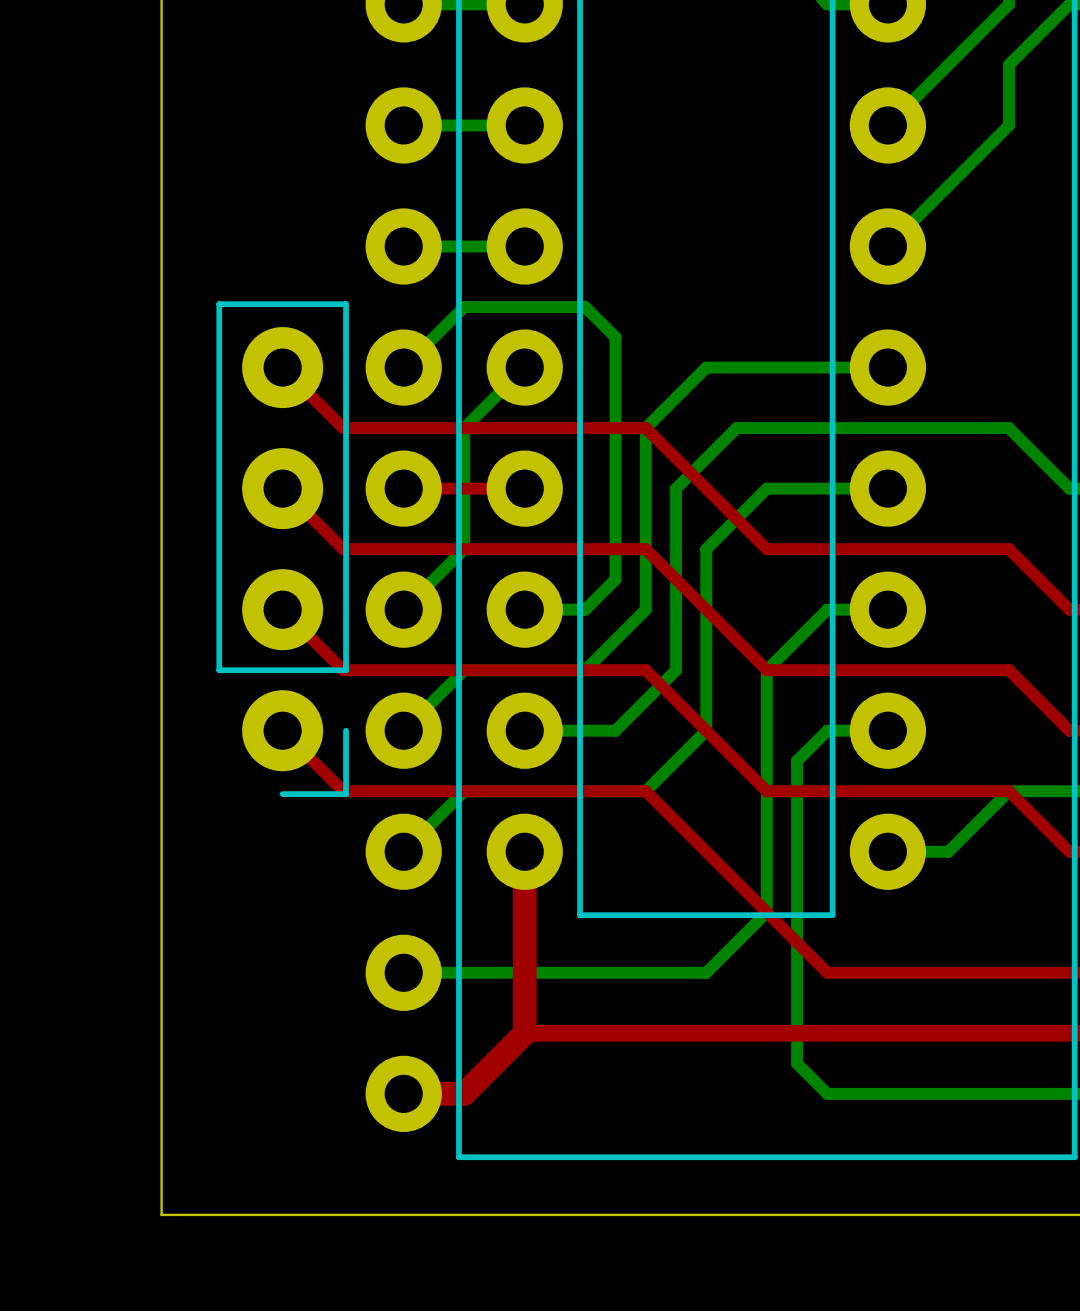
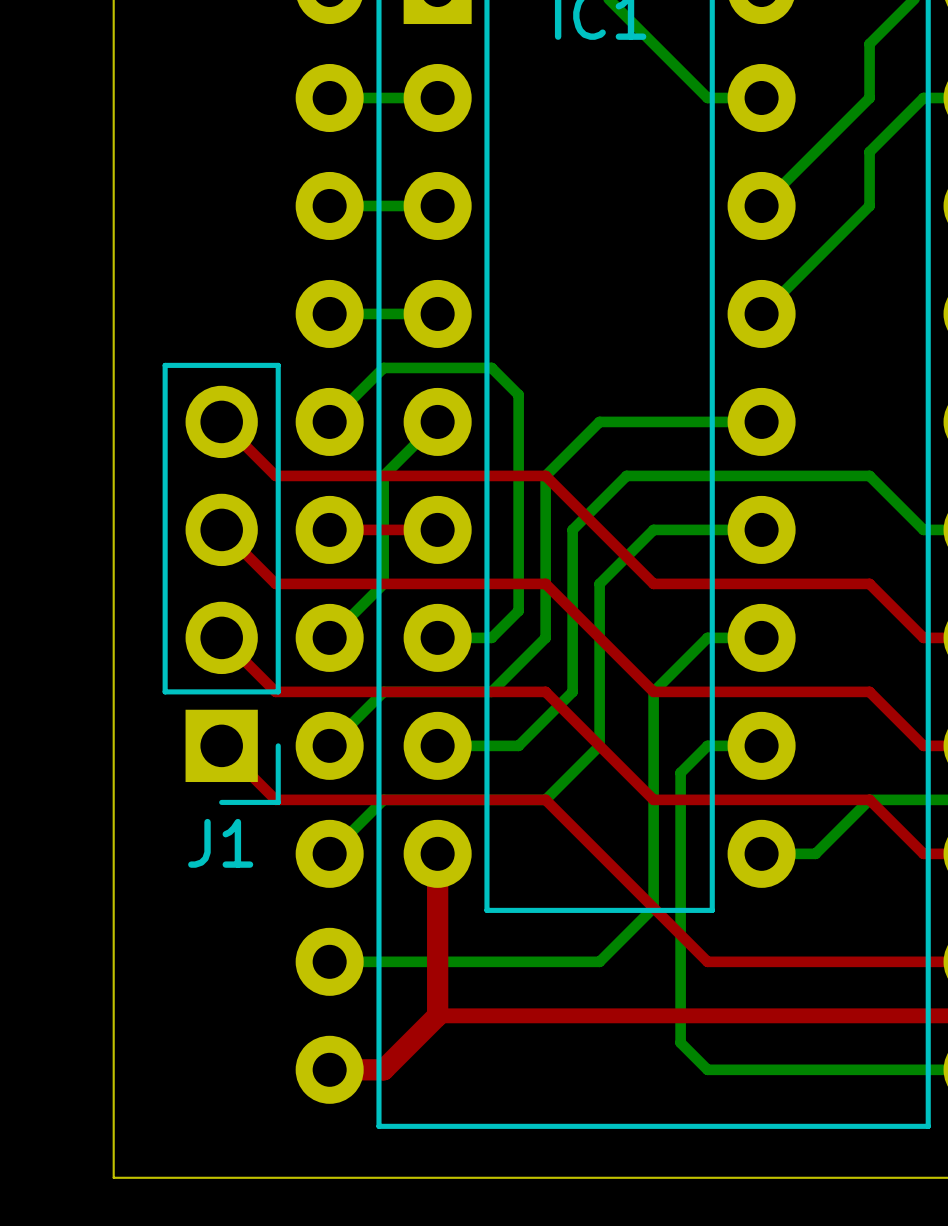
part: (282, 549) -> none
J1: none -> (221, 583)

